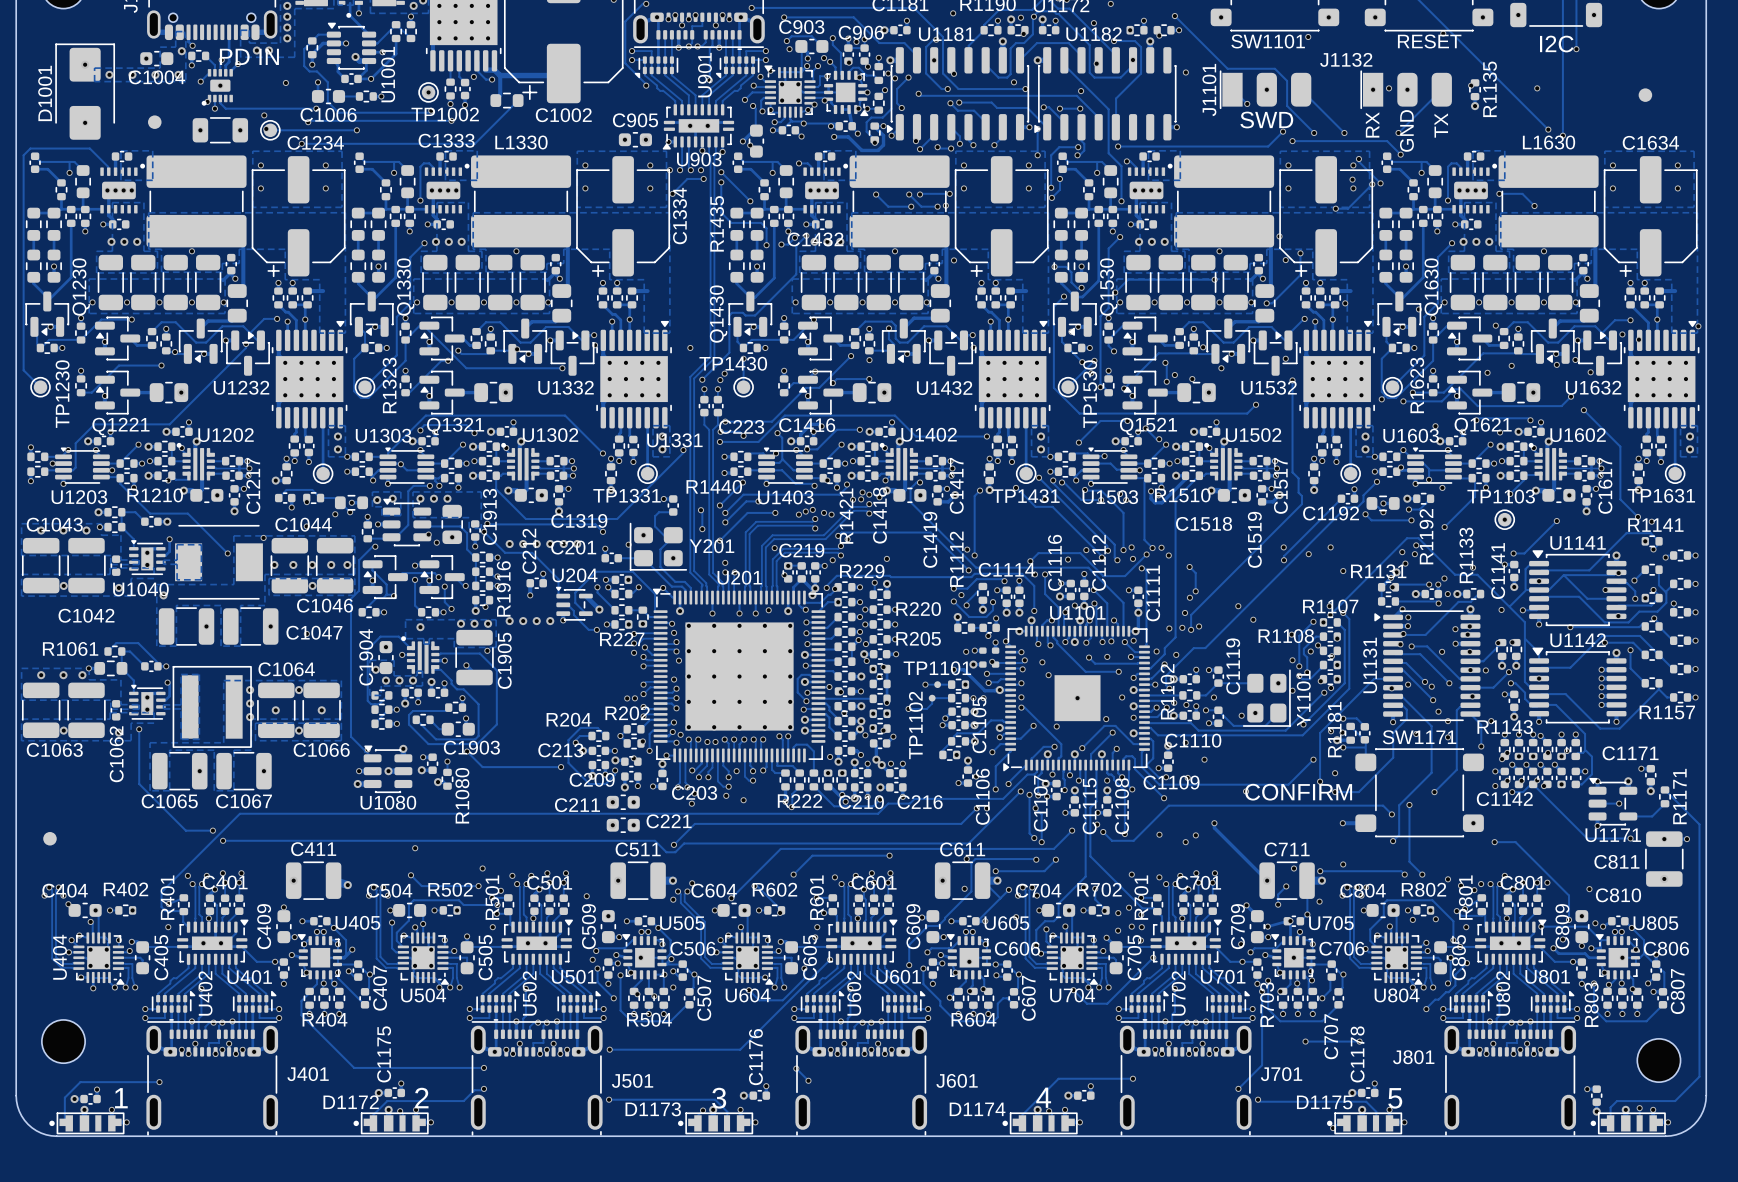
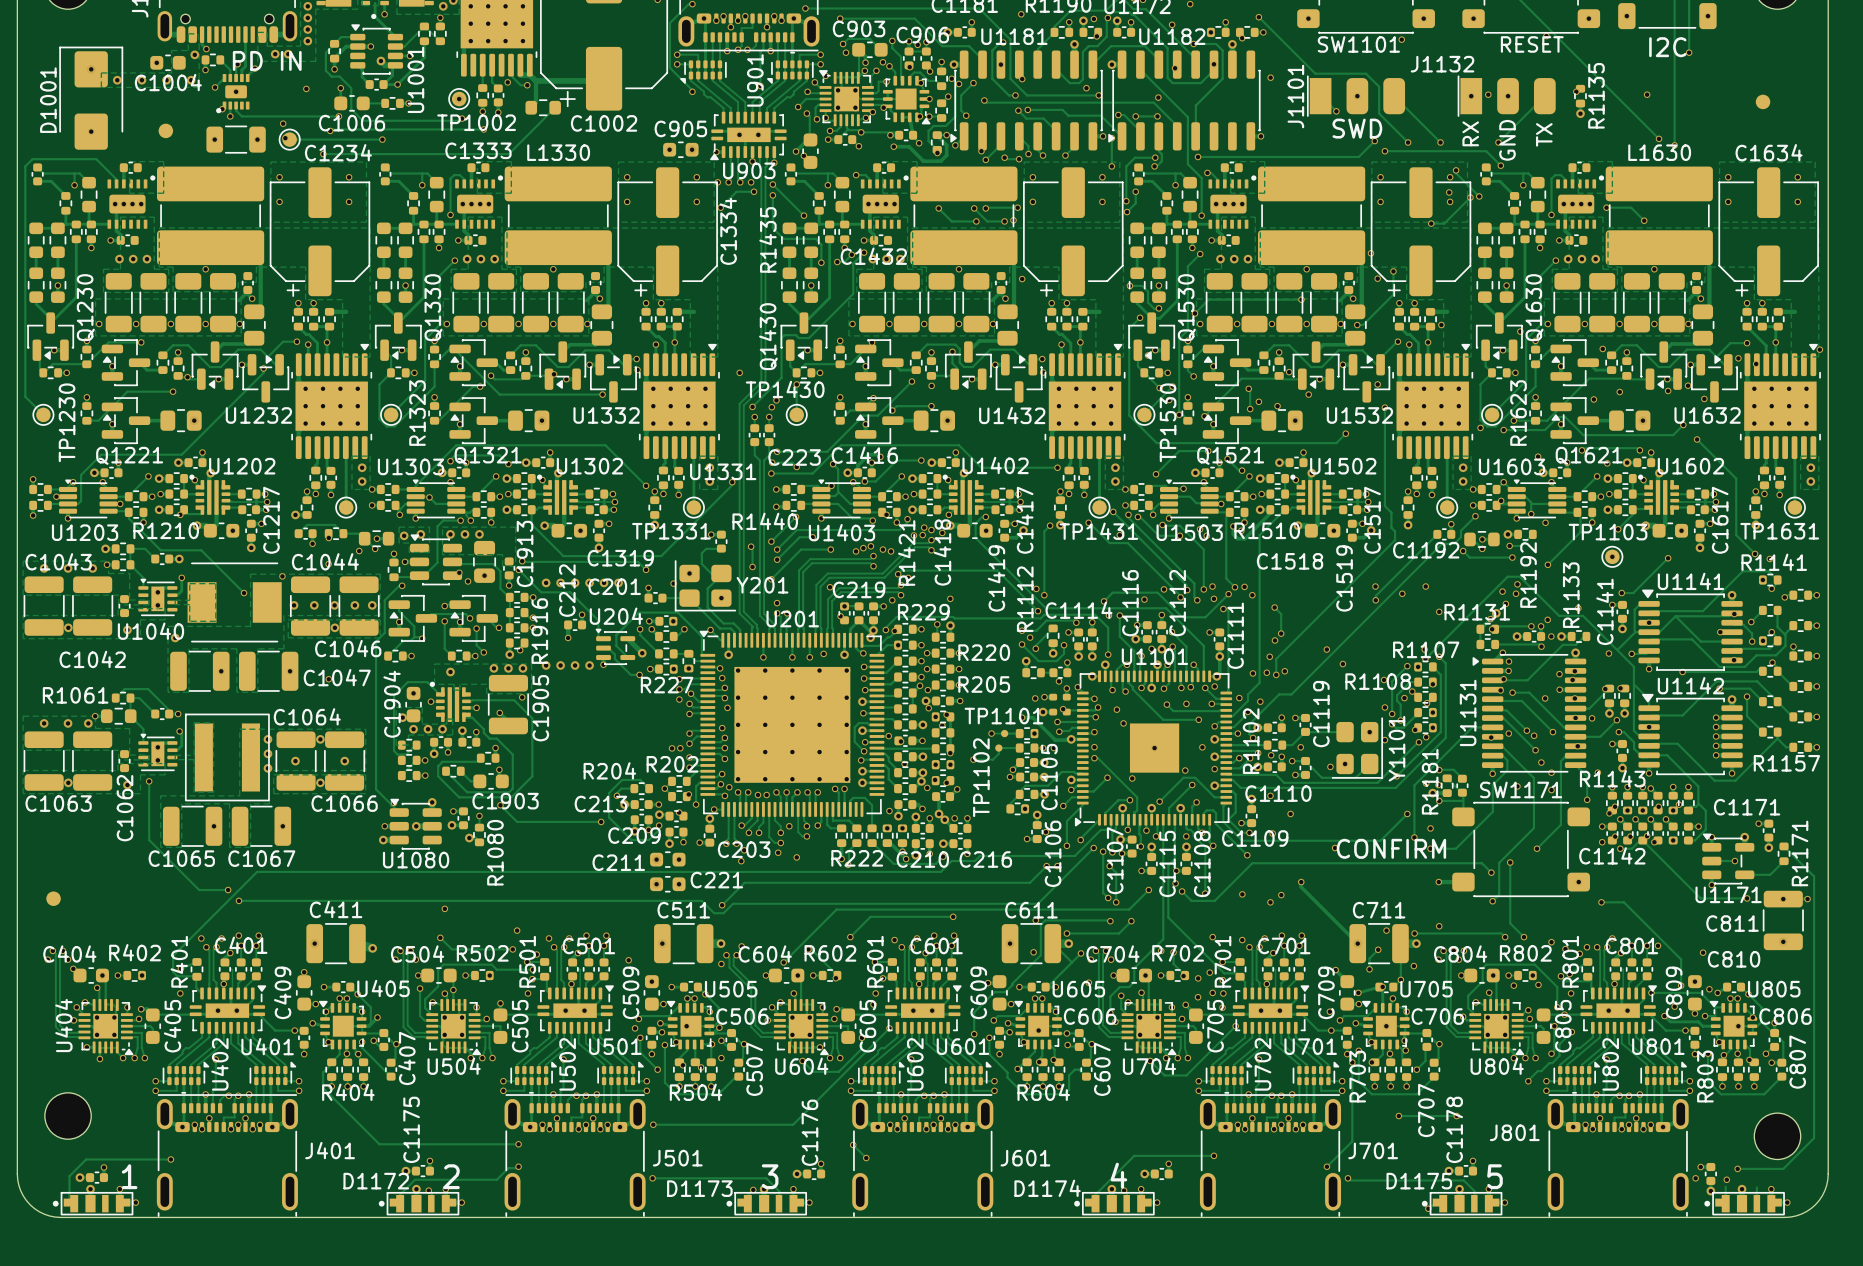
track: (1693, 818) (1699, 824) (1699, 1076) (1675, 1101) (1617, 1101) (1610, 1107) -> (1814, 876) (1814, 1138) (1783, 1168) (1737, 1168)
via: none -> (1737, 1168)
via: none -> (1695, 1178)
via: none -> (1726, 1179)
via: (1639, 1108) -> none

